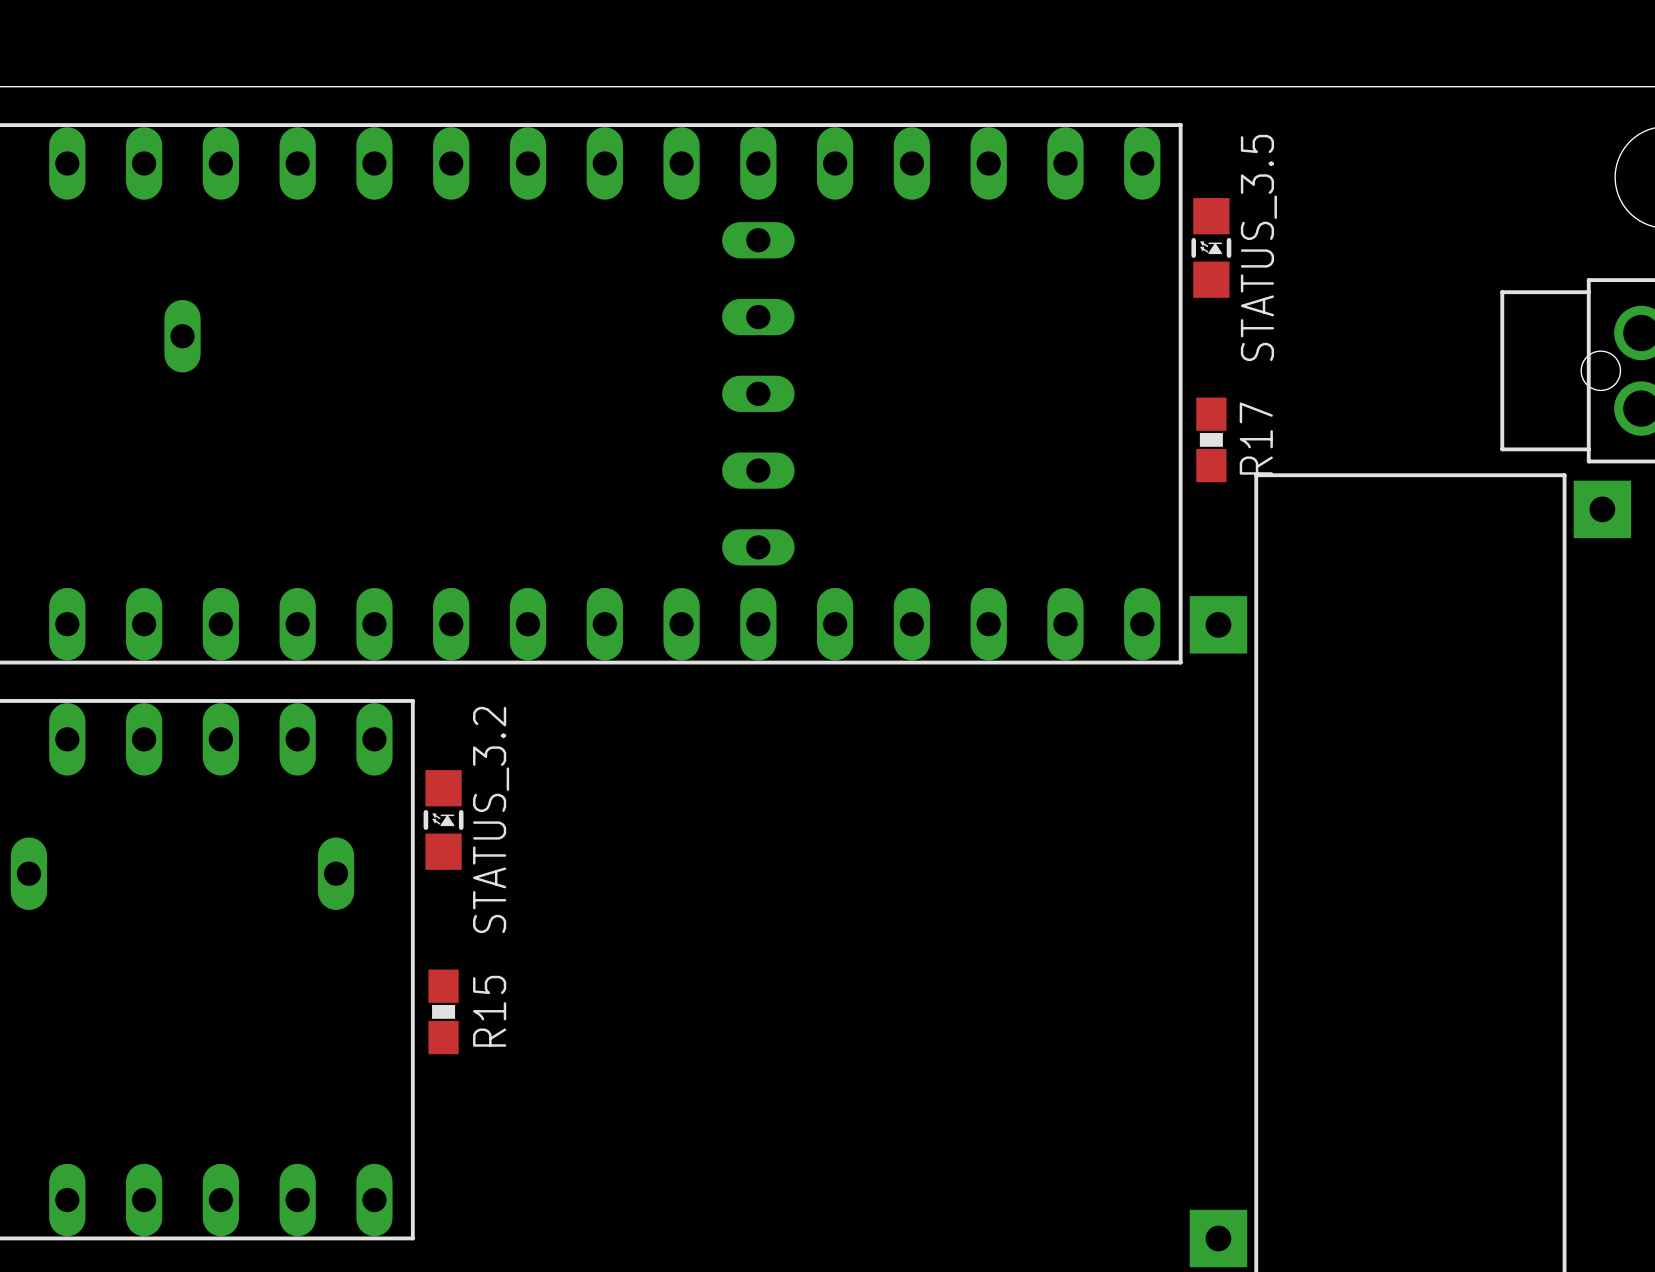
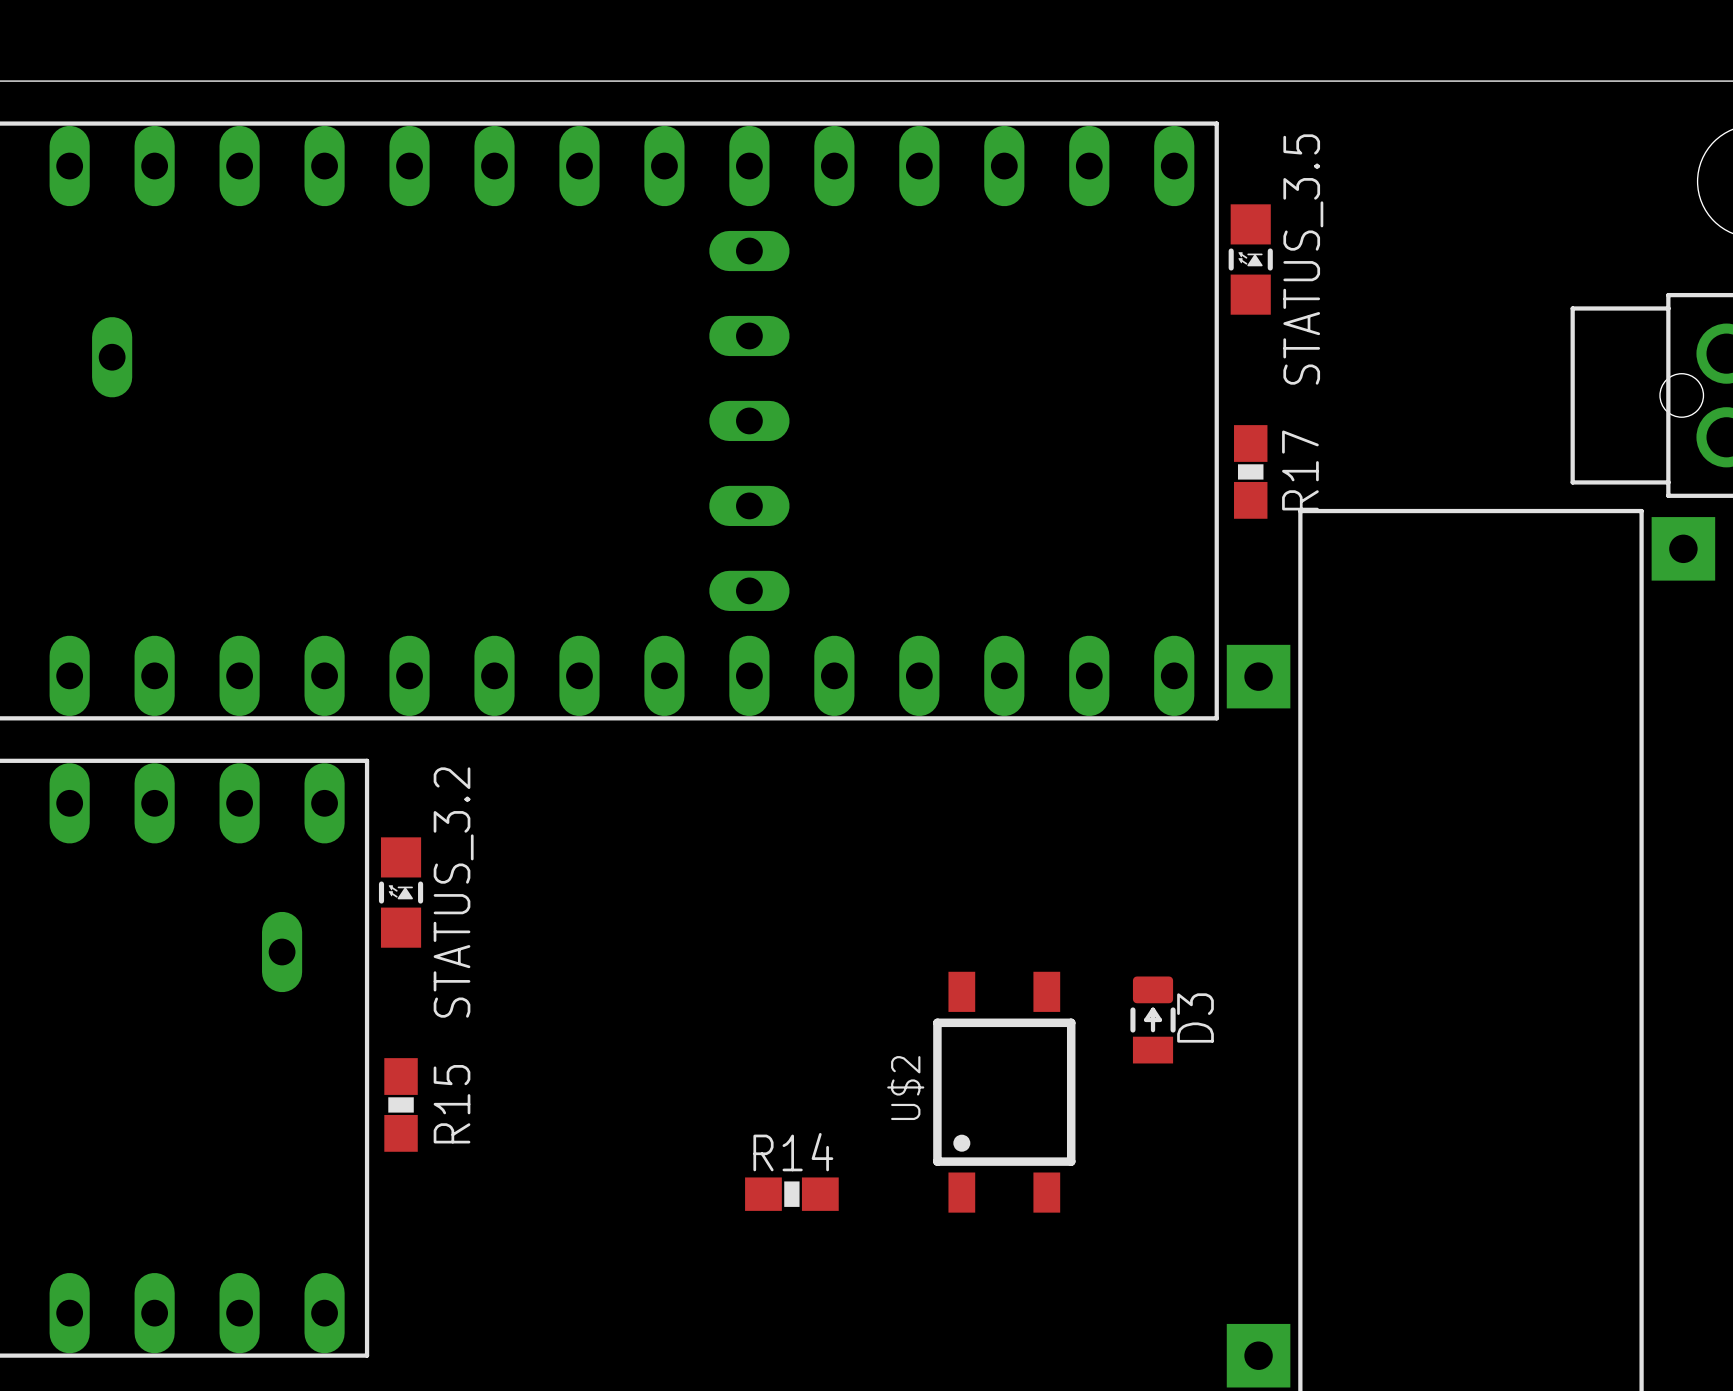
D3: none -> (1153, 1019)
U$2: none -> (1004, 1092)
R14: none -> (791, 1194)

